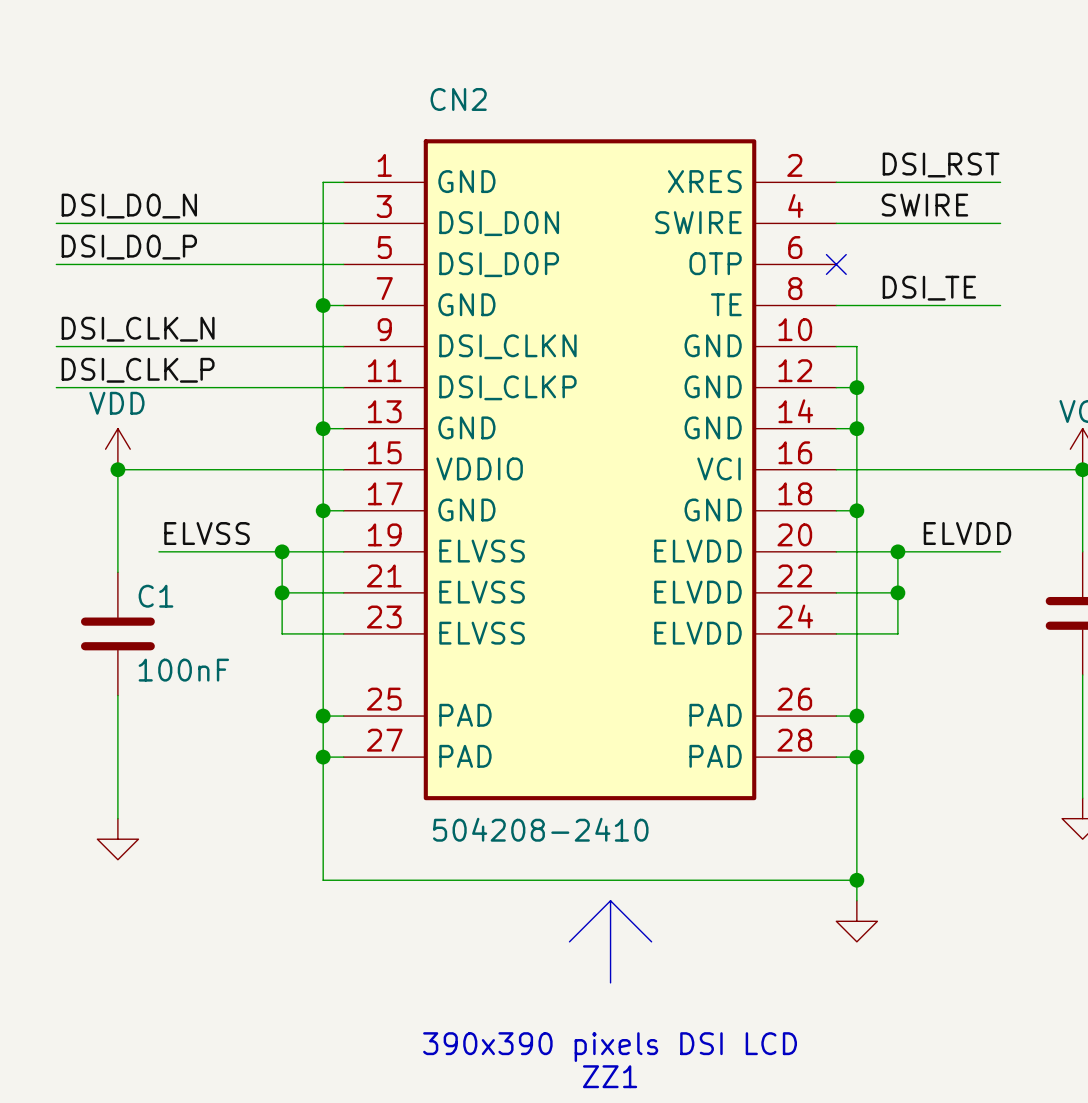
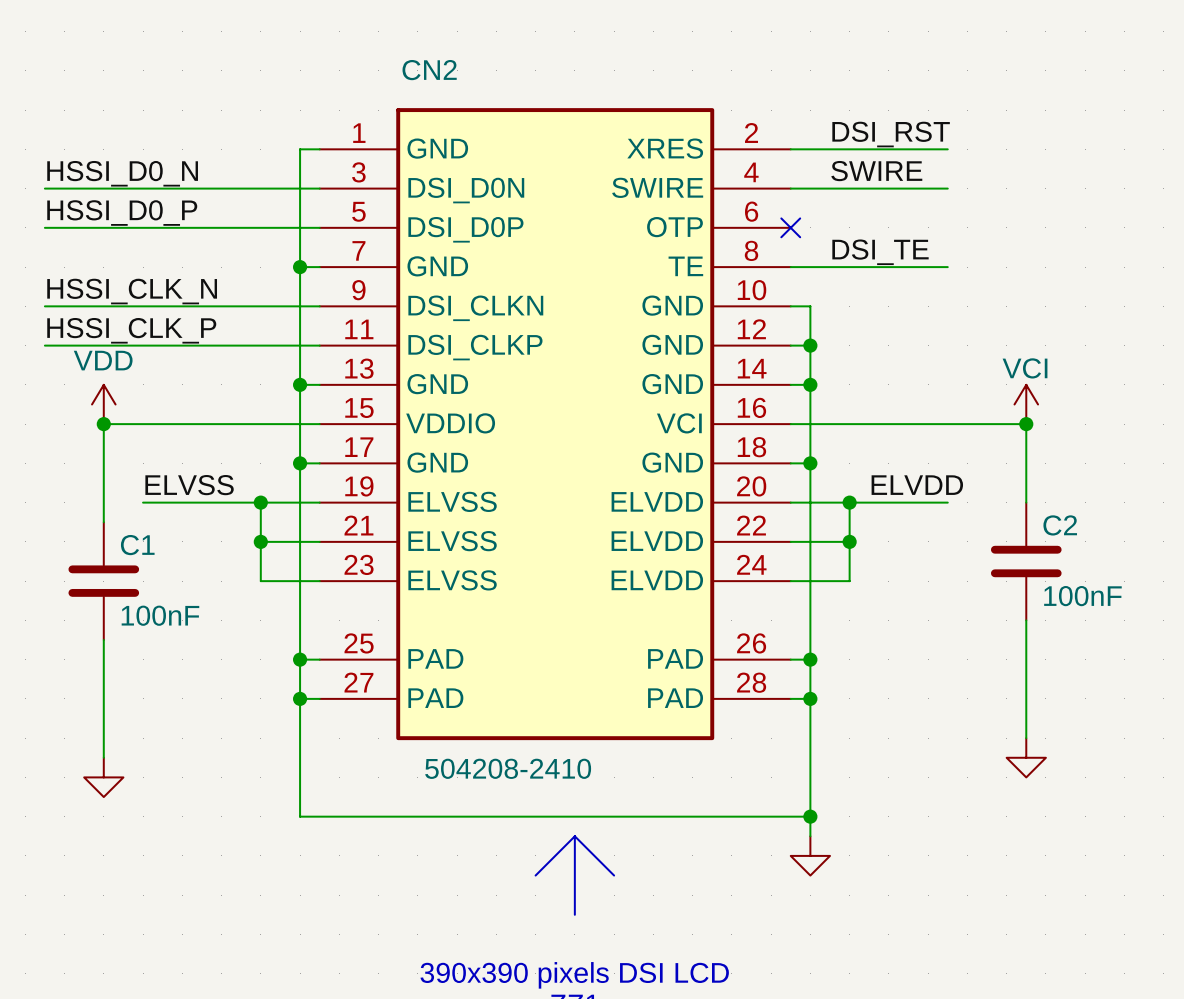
label: DSI_D0_N (129, 206) -> HSSI_D0_N (122, 173)
label: DSI_D0_P (129, 247) -> HSSI_D0_P (122, 213)
label: DSI_CLK_N (138, 329) -> HSSI_CLK_N (132, 291)
label: DSI_CLK_P (138, 370) -> HSSI_CLK_P (131, 330)

